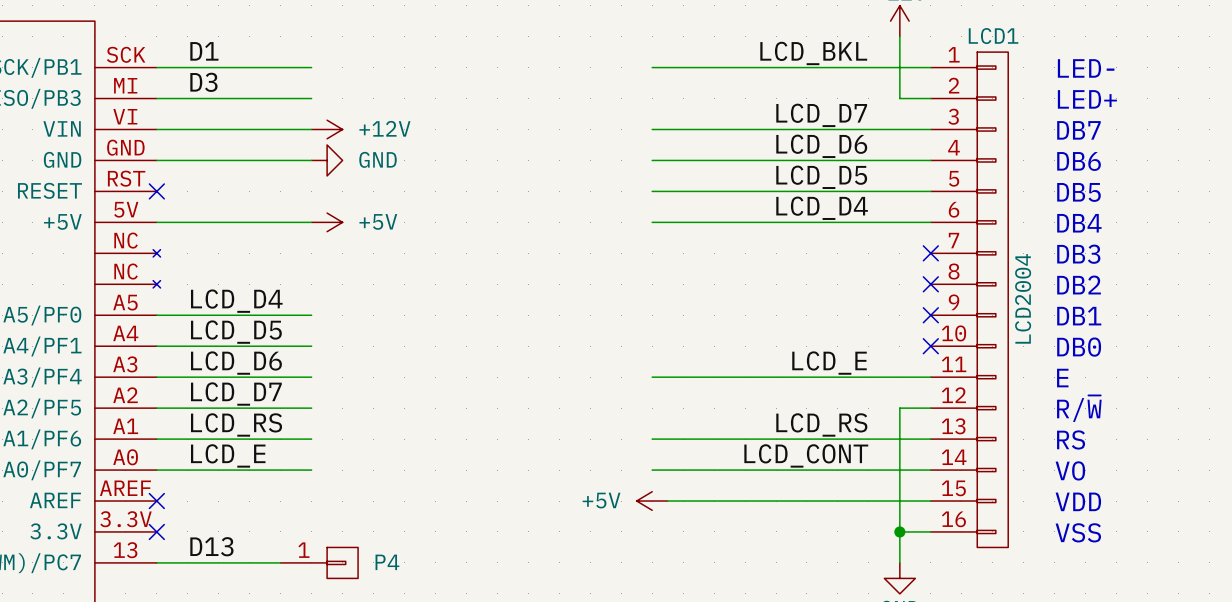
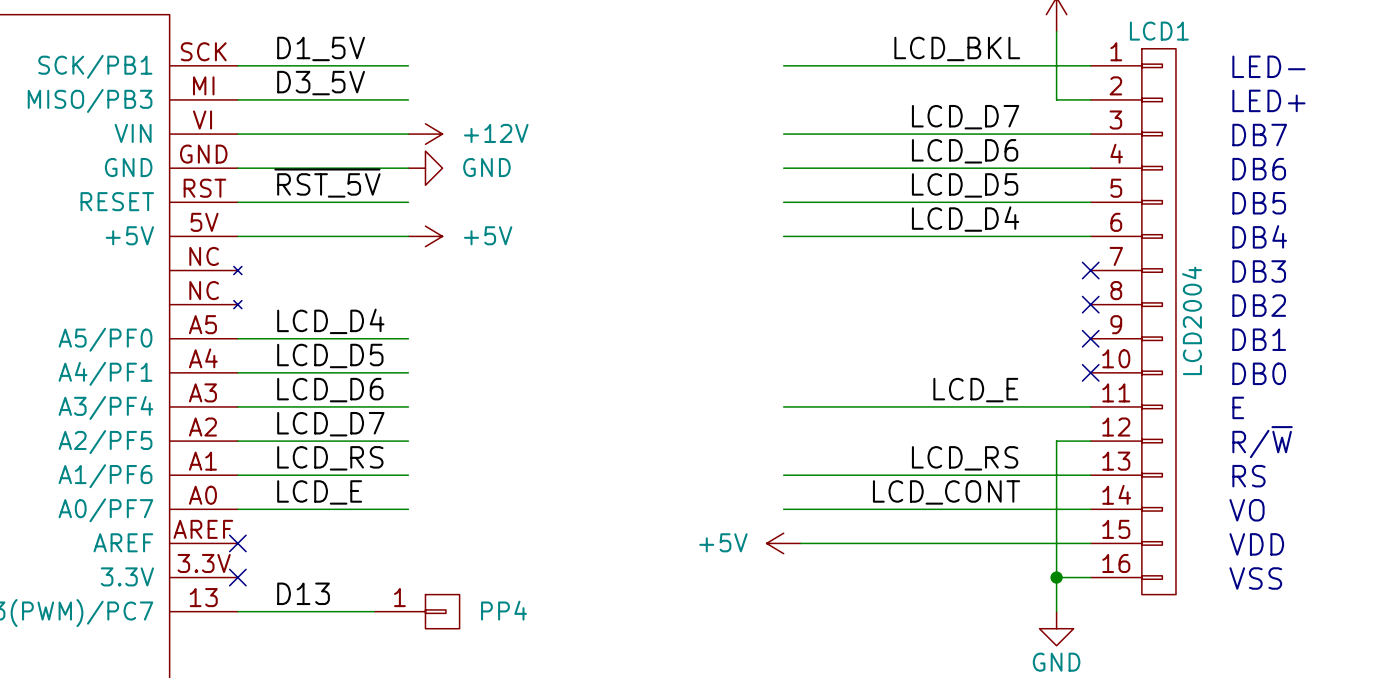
label: D1 (204, 51) -> D1_5V (321, 48)
label: D3 (203, 82) -> D3_5V (321, 83)
label: none -> ~{RST_5V} (327, 183)
wire: none -> (237, 202) (408, 202)
no-connect mark: (156, 191) -> none
P4 name: P4 (387, 562) -> PP4 (503, 610)

